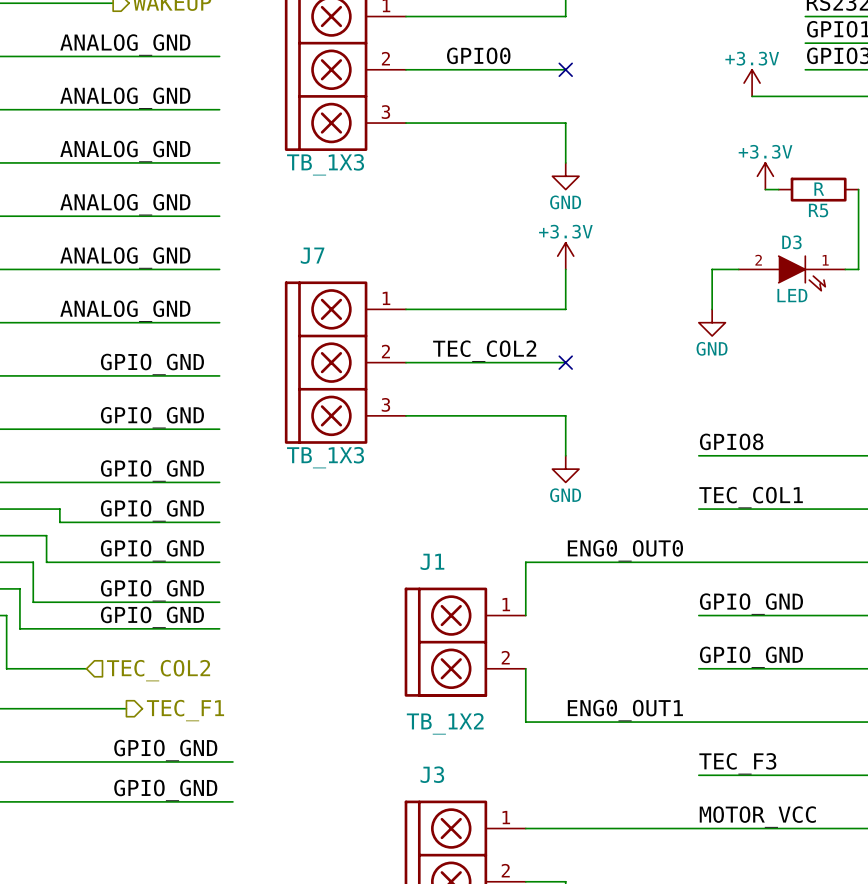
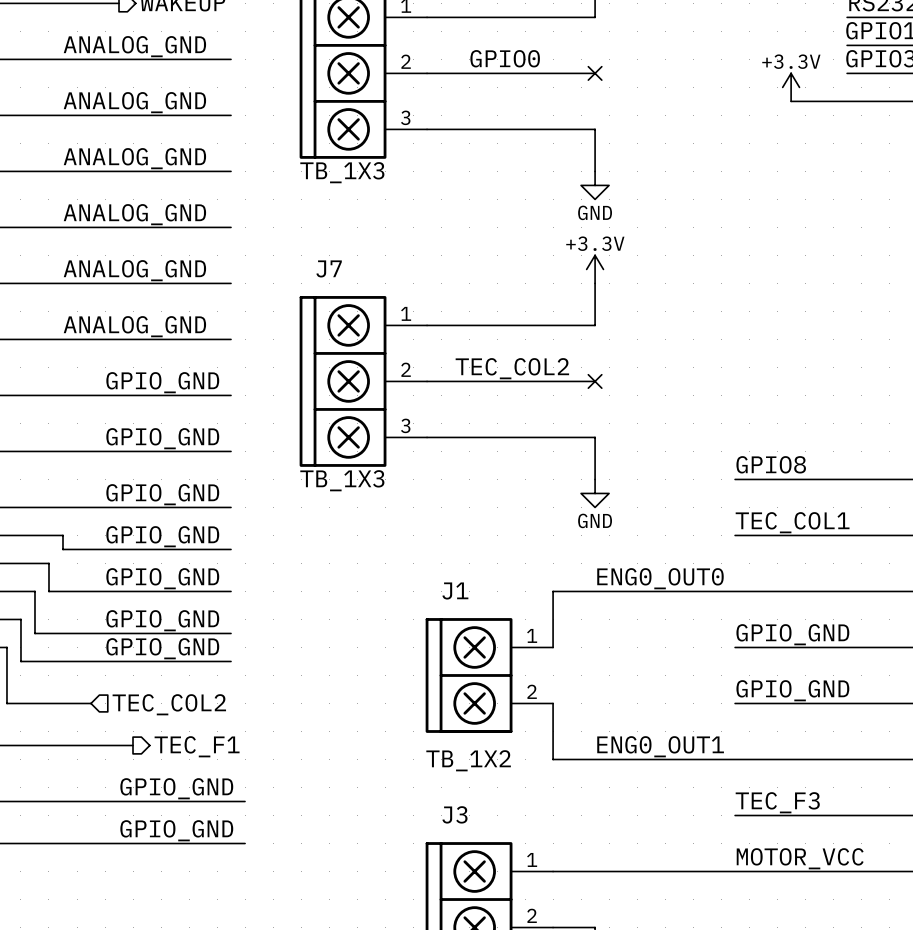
power symbol: +3.3V (765, 176) -> none
wire: (765, 189) (778, 189) -> none
R5: R (818, 189) -> none
wire: (858, 189) (858, 269) (845, 269) -> none
wire: (738, 269) (712, 269) (712, 309) -> none
D3: LED (792, 273) -> none
power symbol: GND (712, 322) -> none

